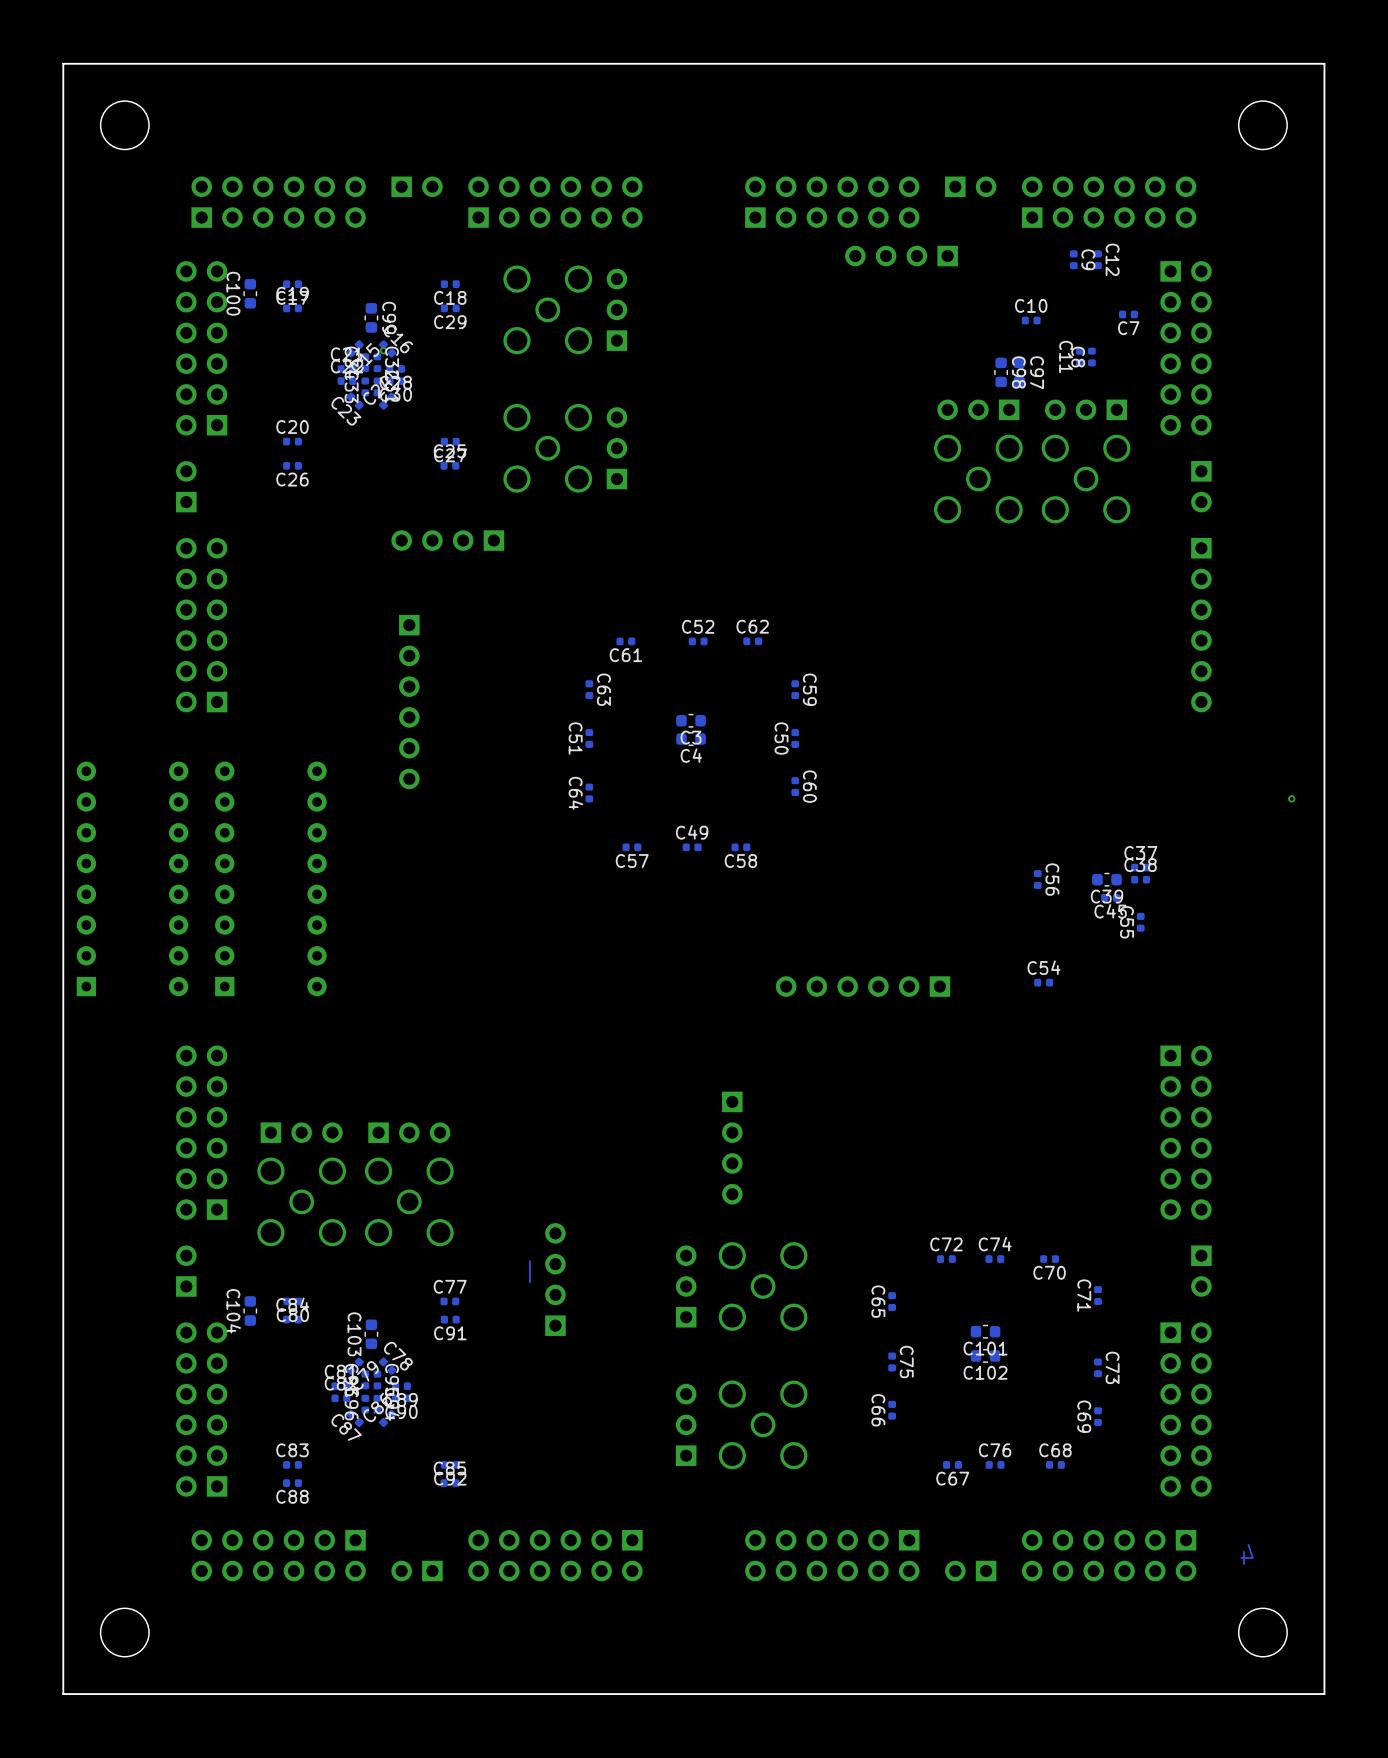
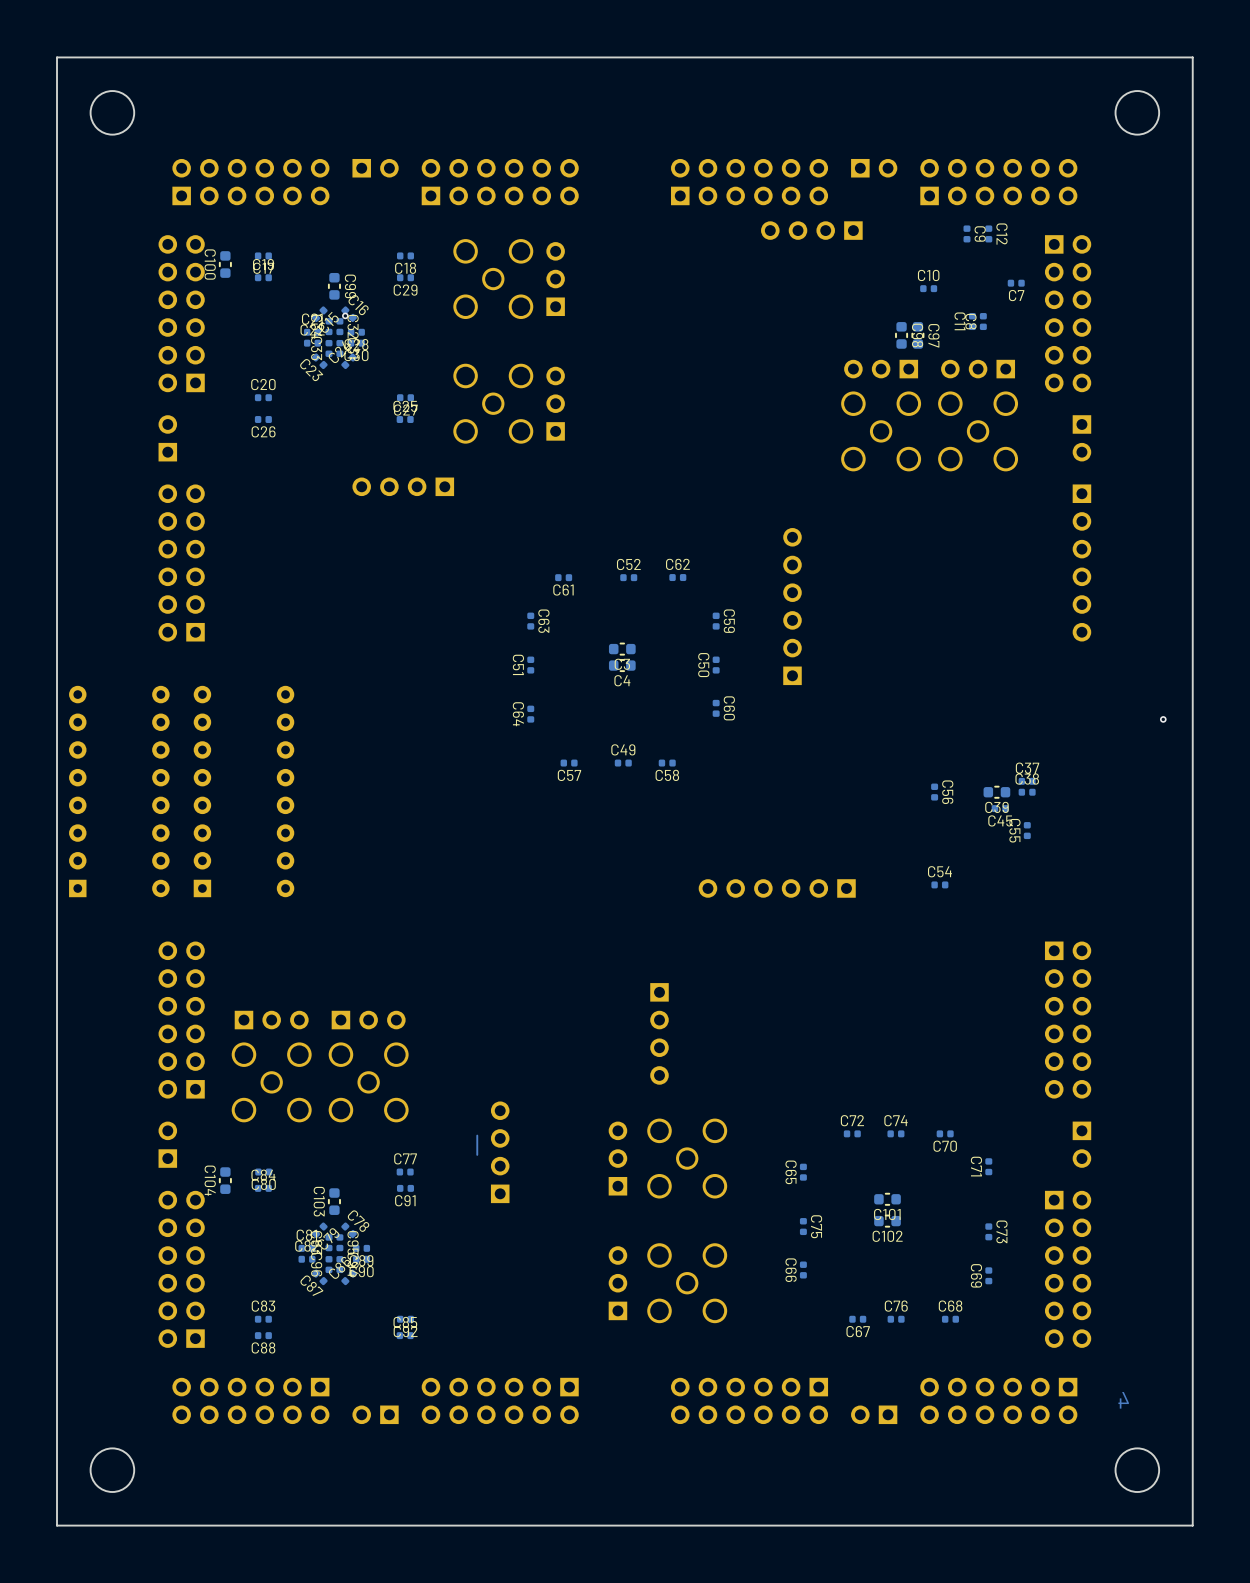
part: none -> (792, 606)
part: (409, 702) -> none

